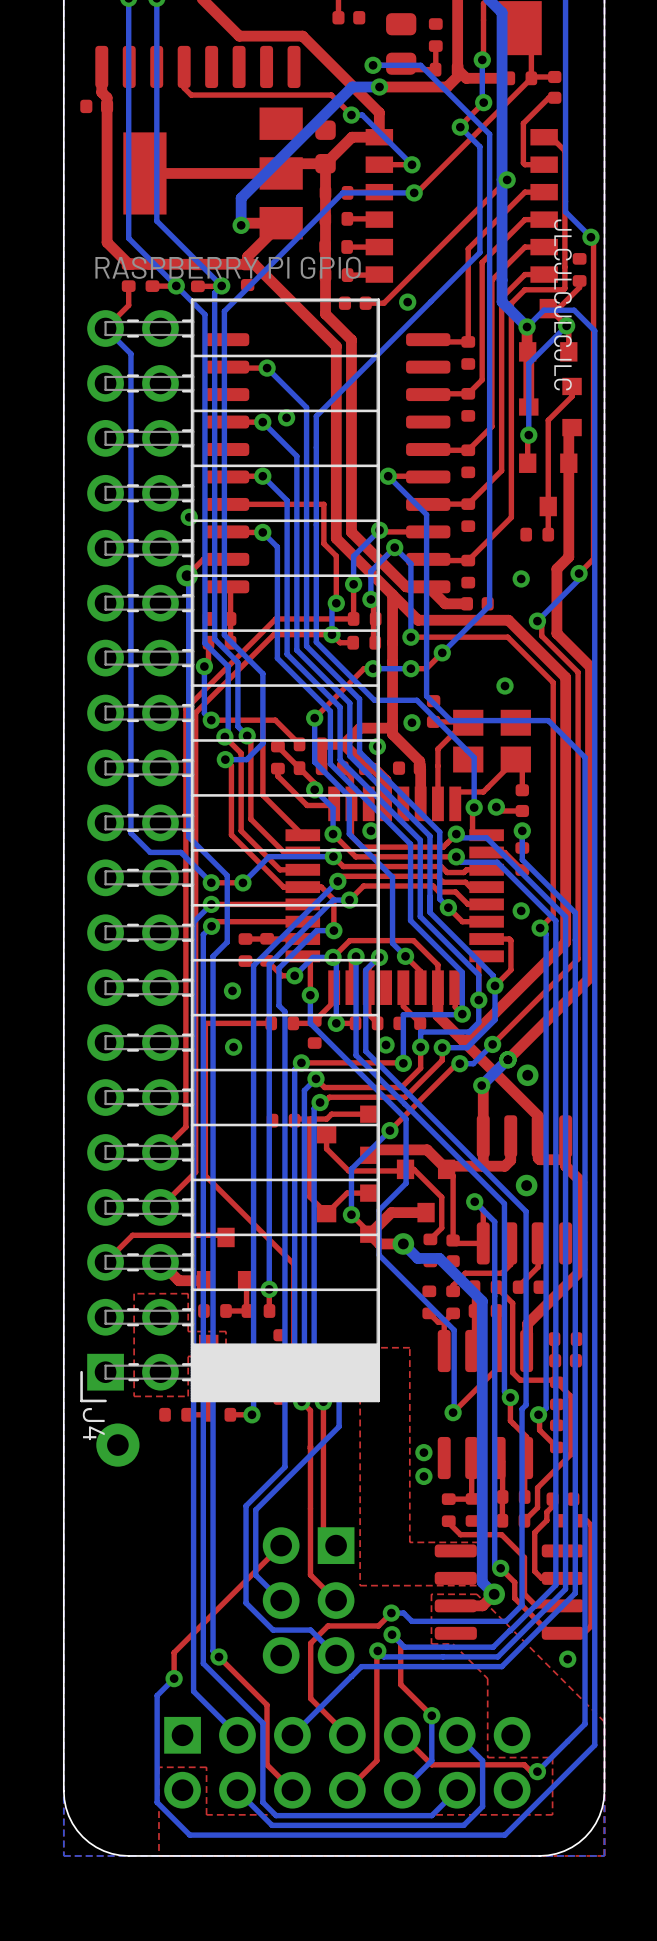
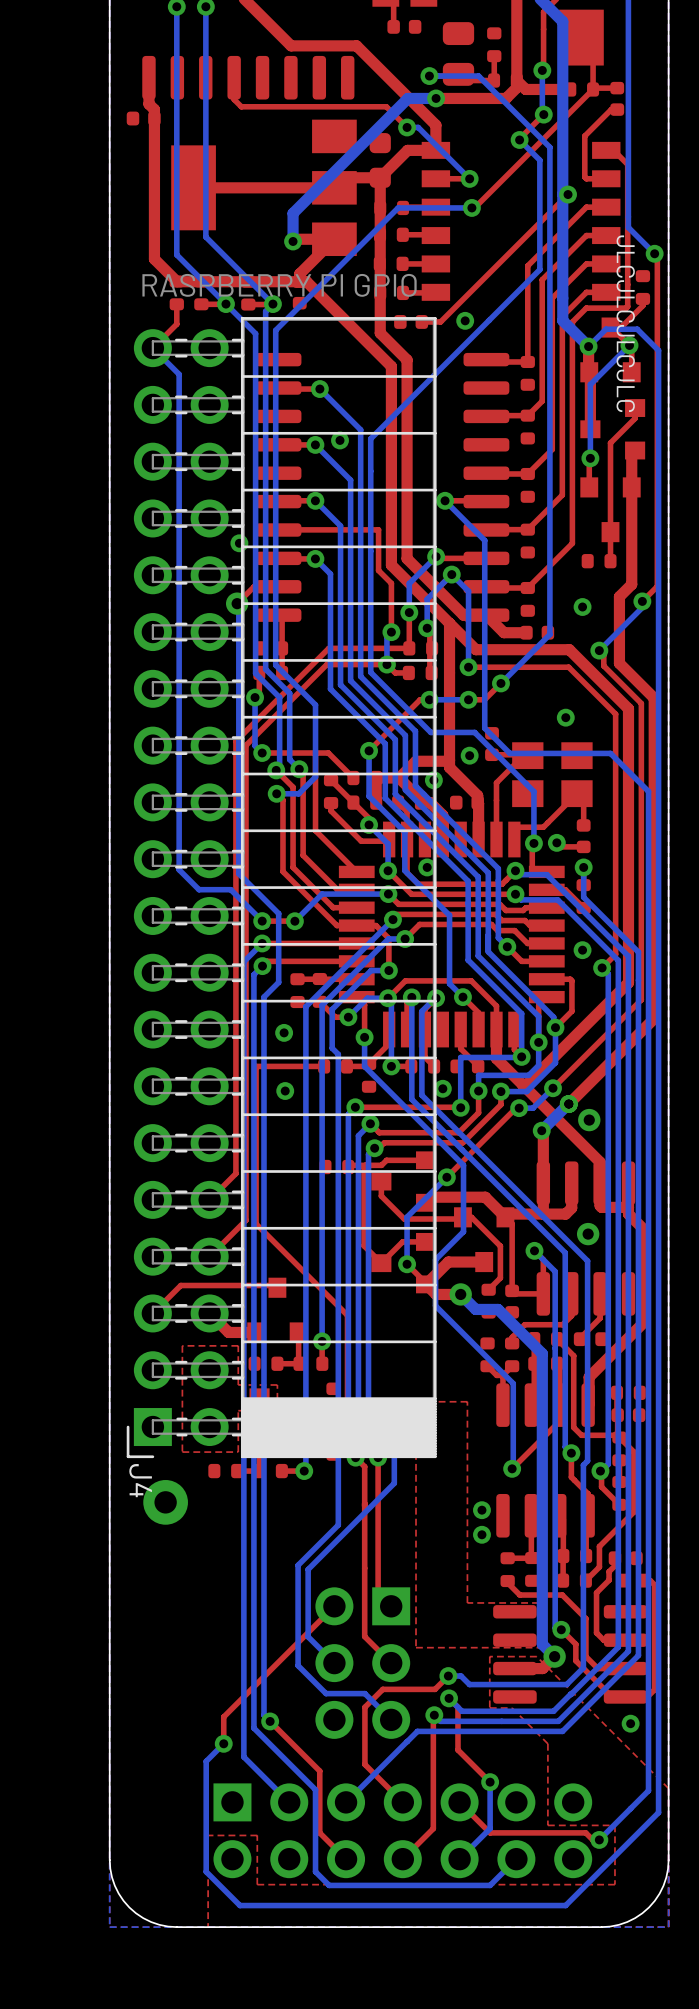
bottom track: (457, 1735) (482, 1760) (482, 1806) (463, 1825) (272, 1825) (237, 1790) -> none

